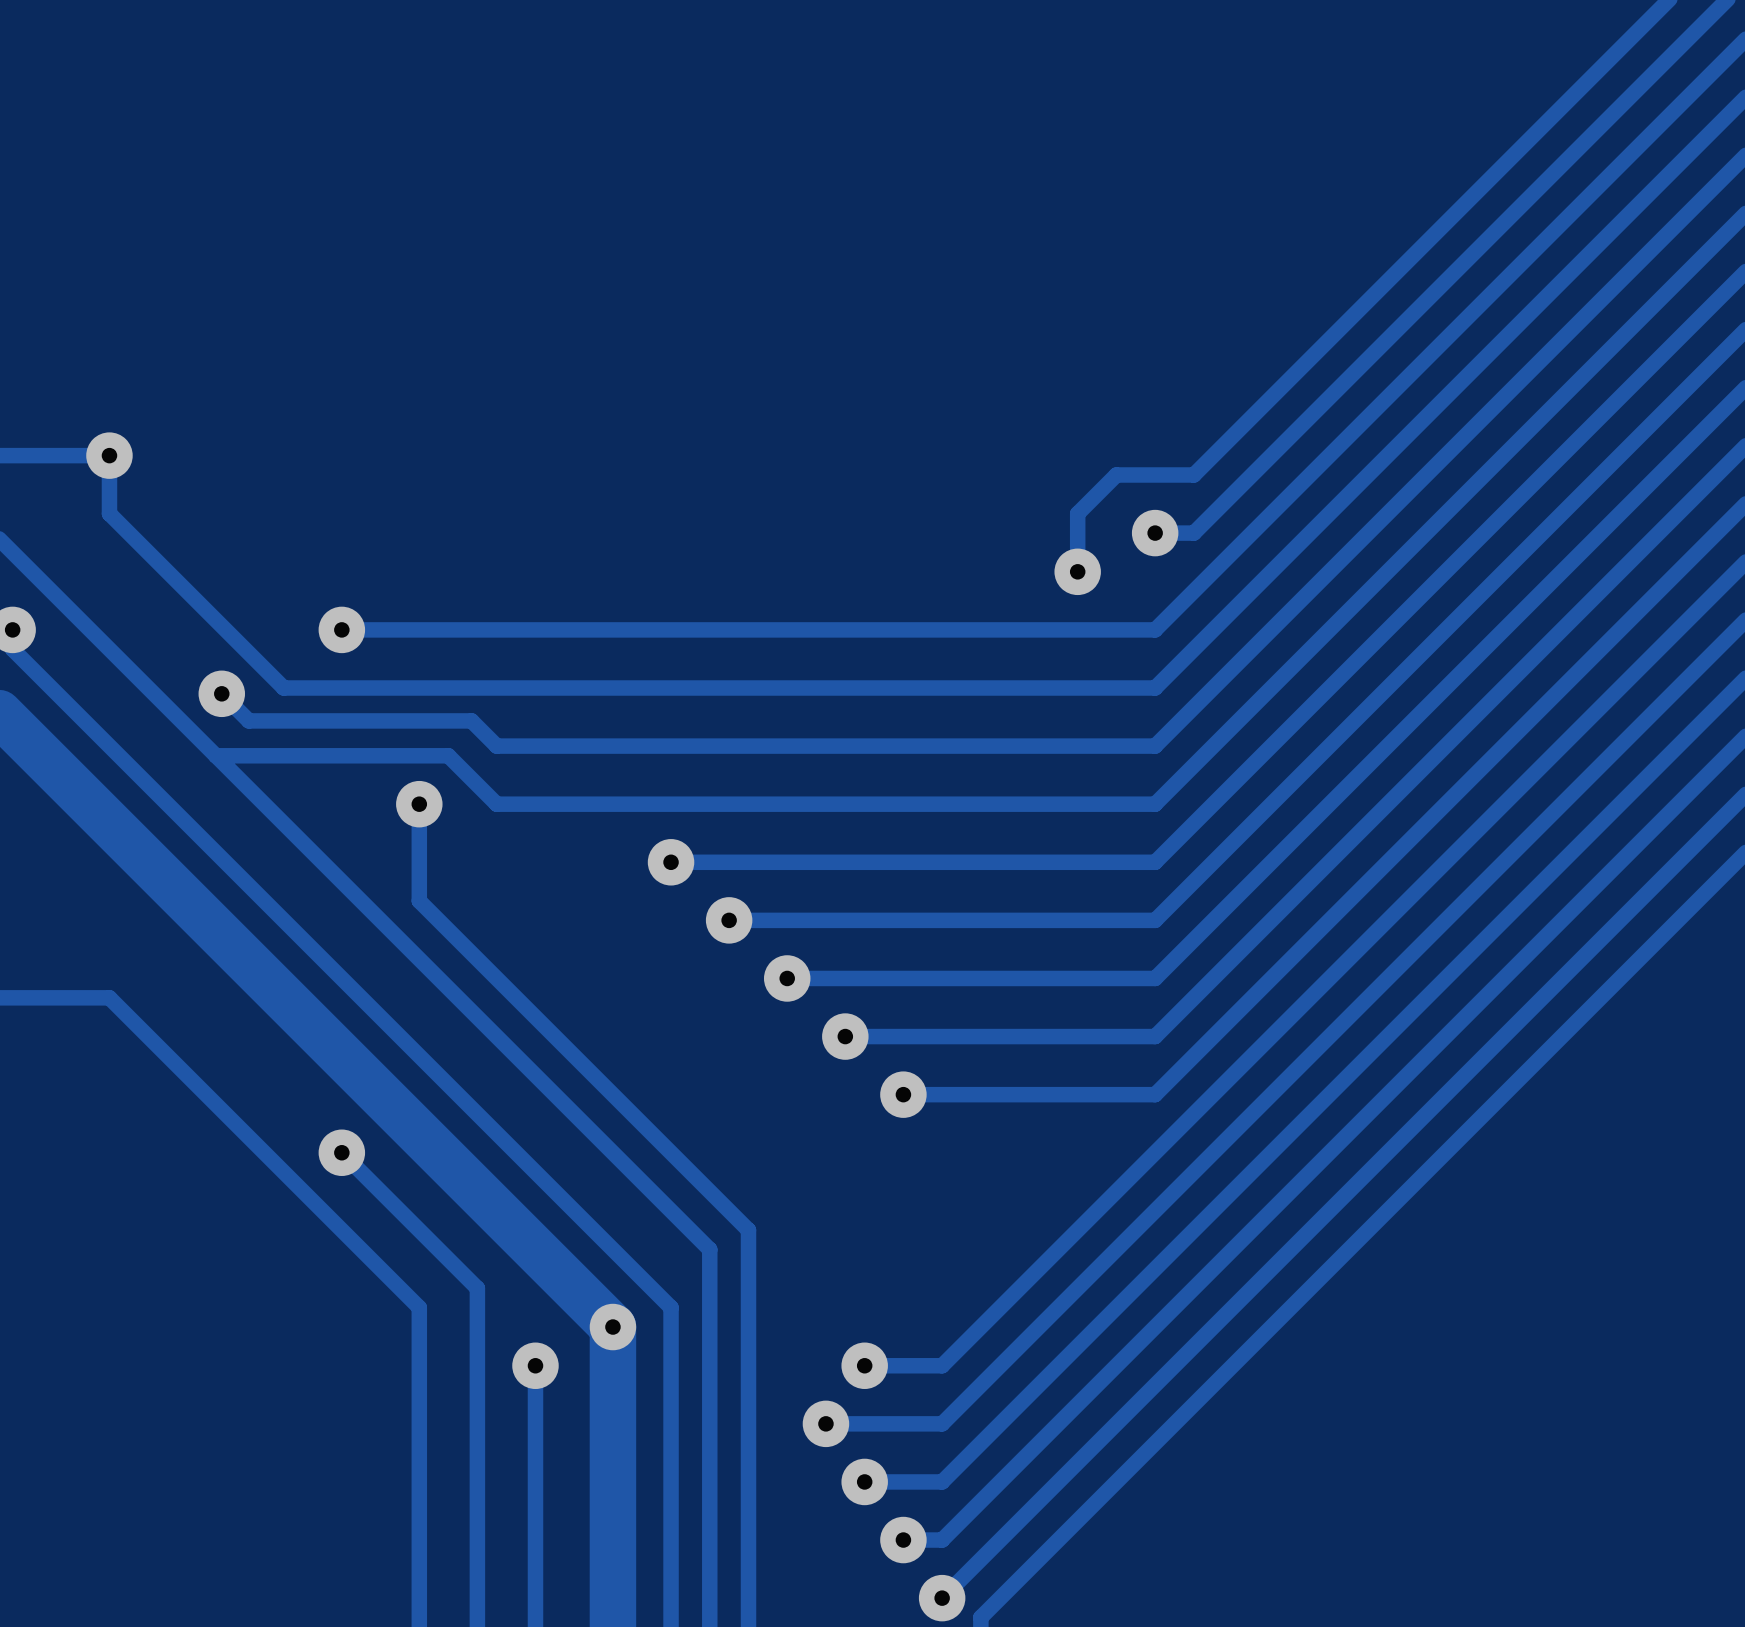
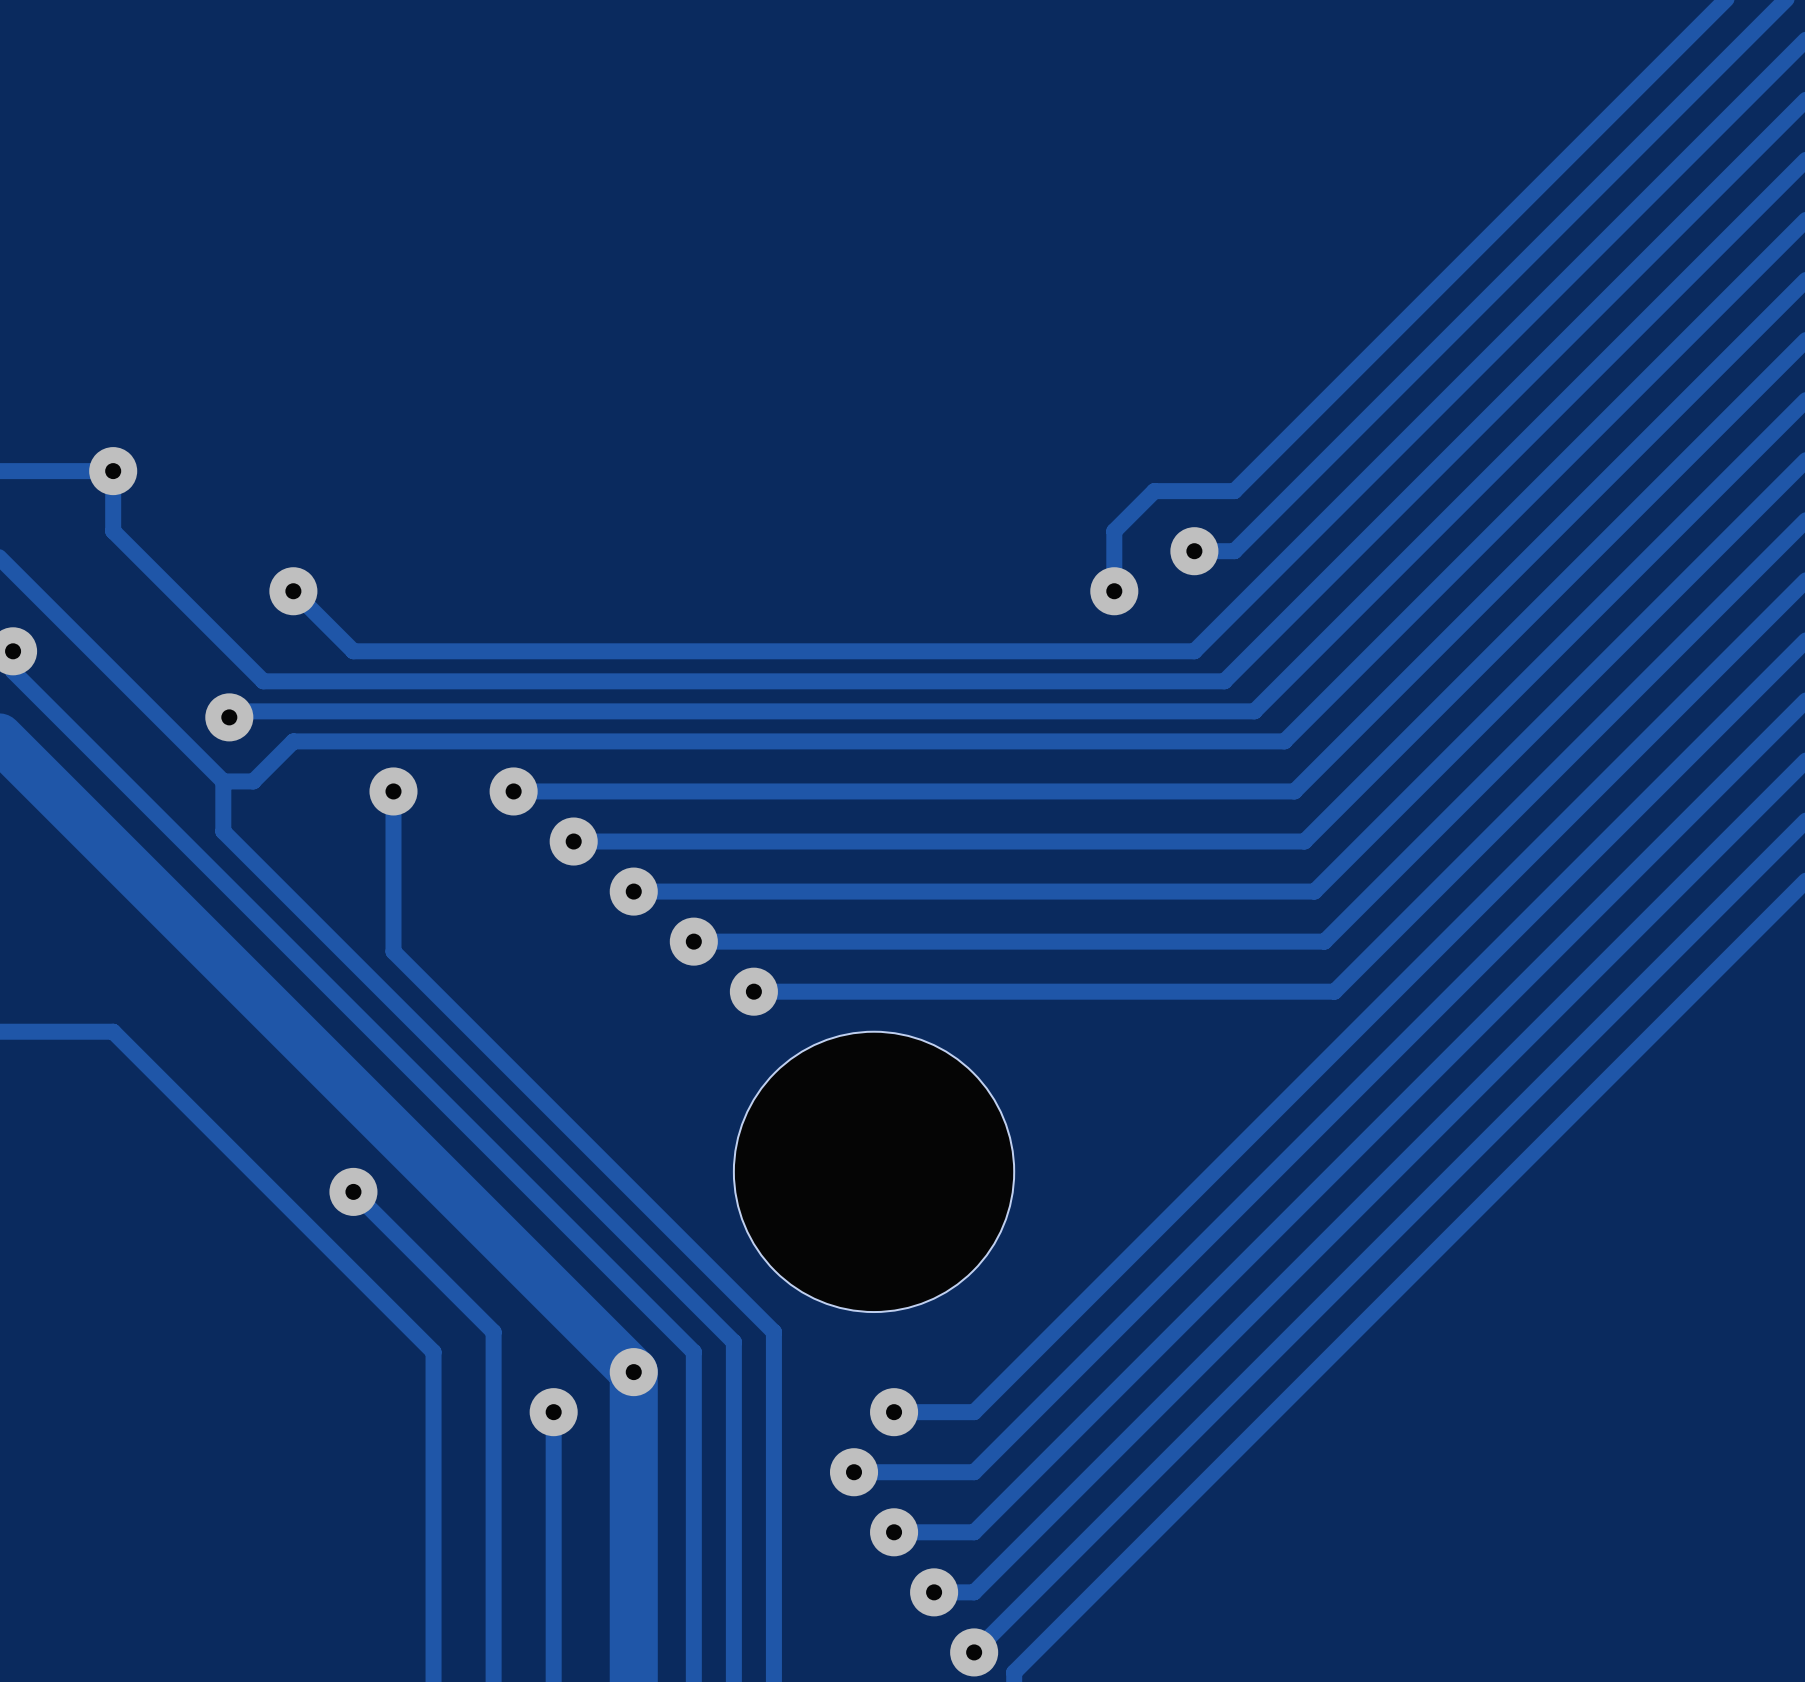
track: none -> (293, 591) (353, 651)
via: none -> (293, 591)
via: (341, 629) -> none
track: (254, 658) (283, 688) -> (229, 717) (235, 711) (293, 711)
track: (1184, 658) (1155, 688) -> (1254, 711) (1194, 711)
track: none -> (1224, 681) (263, 681)
track: (1213, 688) (1155, 746) (496, 746) (471, 720) (248, 720) (221, 693) -> none
track: (1242, 717) (1155, 804) (496, 804) (448, 755) (245, 755) -> (1284, 741) (293, 741) (253, 781)
track: (215, 755) (380, 920) -> (393, 791) (393, 951)
track: none -> (223, 781) (223, 831) (733, 1342)
via: none -> (513, 791)
track: (1251, 765) (1155, 862) -> (1314, 891) (1194, 891)
track: none -> (1294, 791) (513, 791)
track: (419, 804) (419, 901) (748, 1230) (748, 1288) -> none
via position: (419, 804) -> (393, 791)
via: none -> (573, 841)
track: (1261, 813) (1155, 920) (729, 920) -> (1304, 841) (573, 841)
via: none -> (633, 891)
track: none -> (693, 891) (633, 891)
via: (671, 862) -> none
track: (1271, 862) (1155, 978) (787, 978) -> none
via: none -> (693, 941)
track: (1281, 910) (1155, 1036) (845, 1036) -> (1324, 941) (693, 941)
via position: (729, 920) -> (753, 991)
track: (1290, 959) (1155, 1094) (903, 1094) -> (1334, 991) (753, 991)
via: (787, 978) -> none
via: (845, 1036) -> none
via: (903, 1094) -> none
hole: none -> (874, 1171)
track: (709, 1249) (709, 1297) -> (733, 1292) (773, 1332)

